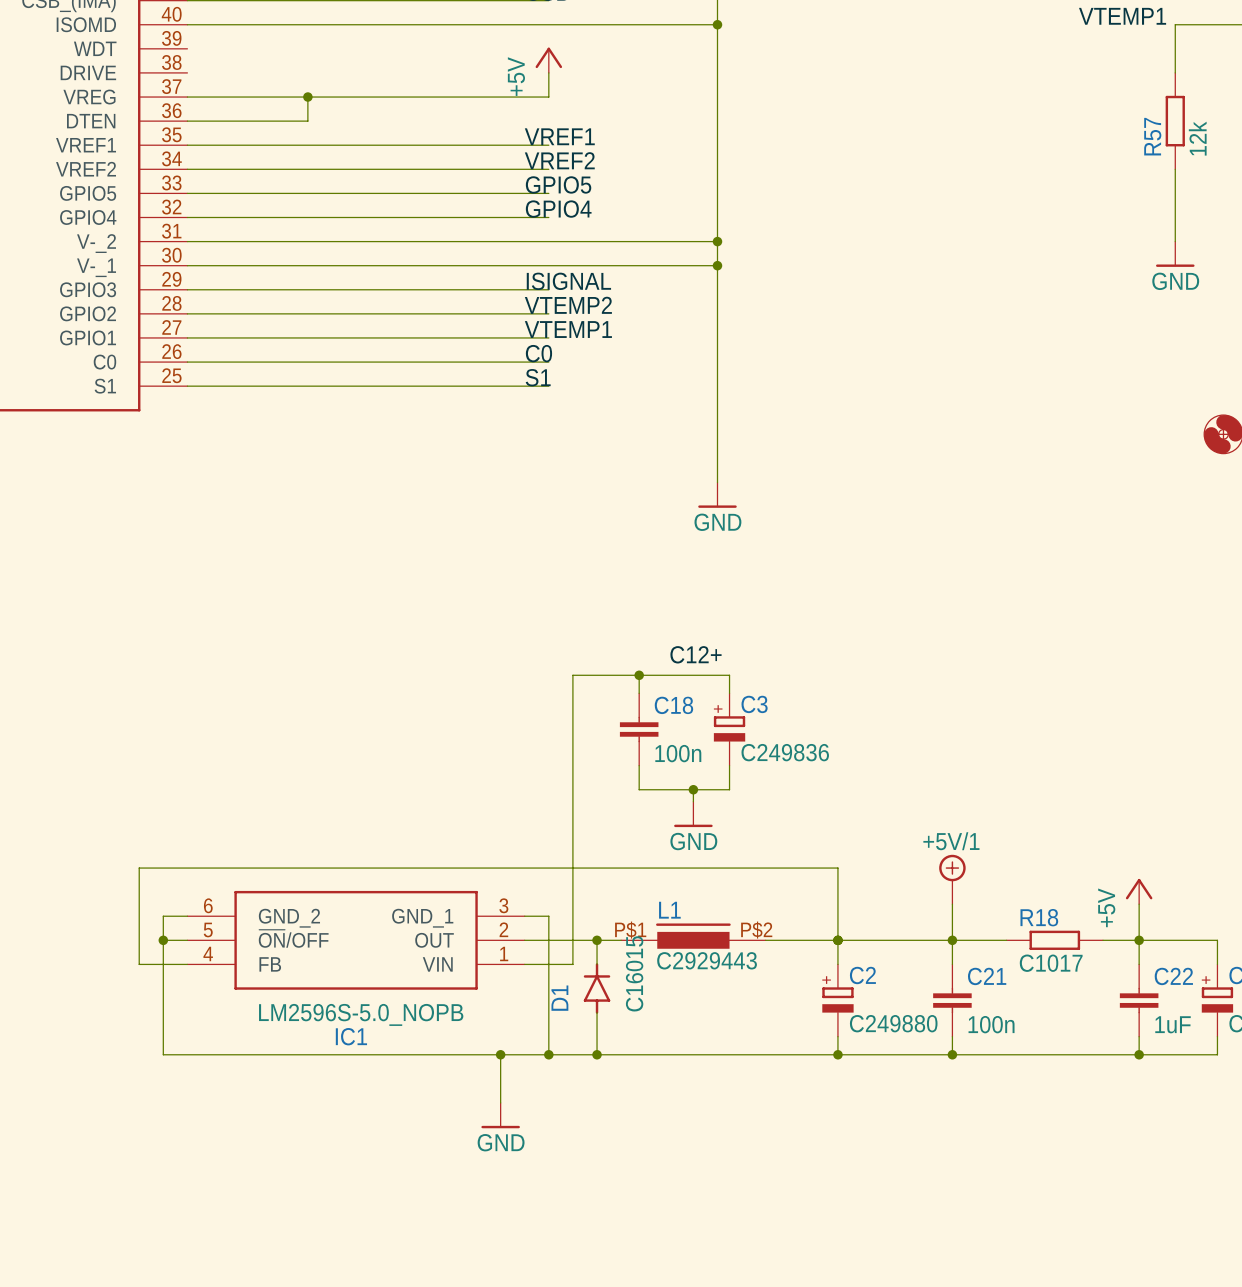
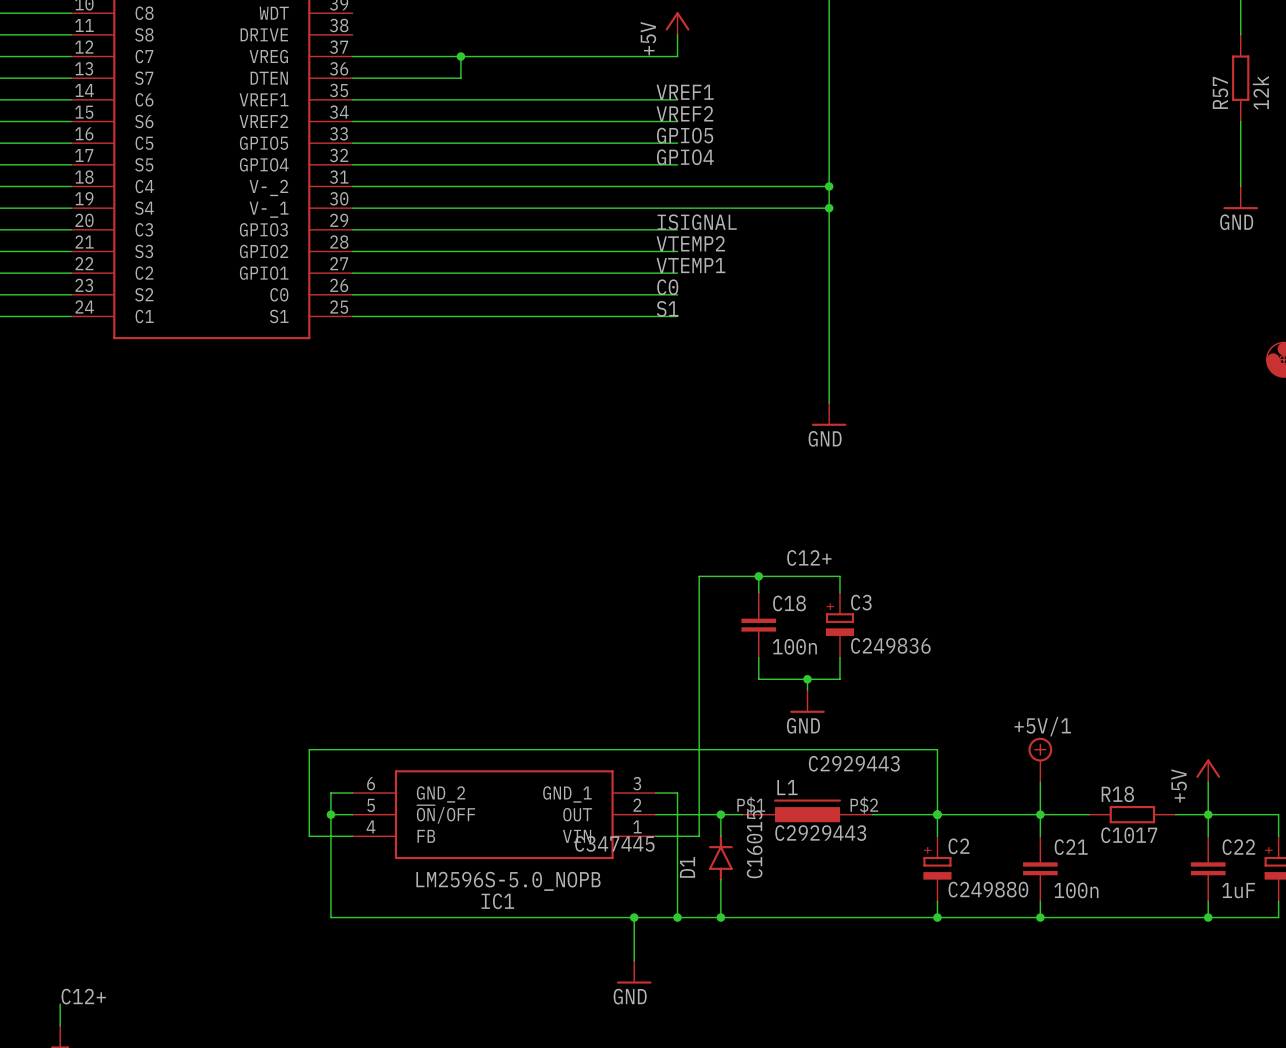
L1 text: none -> C2929443 (854, 763)
IC1 text: none -> C347445 (614, 843)

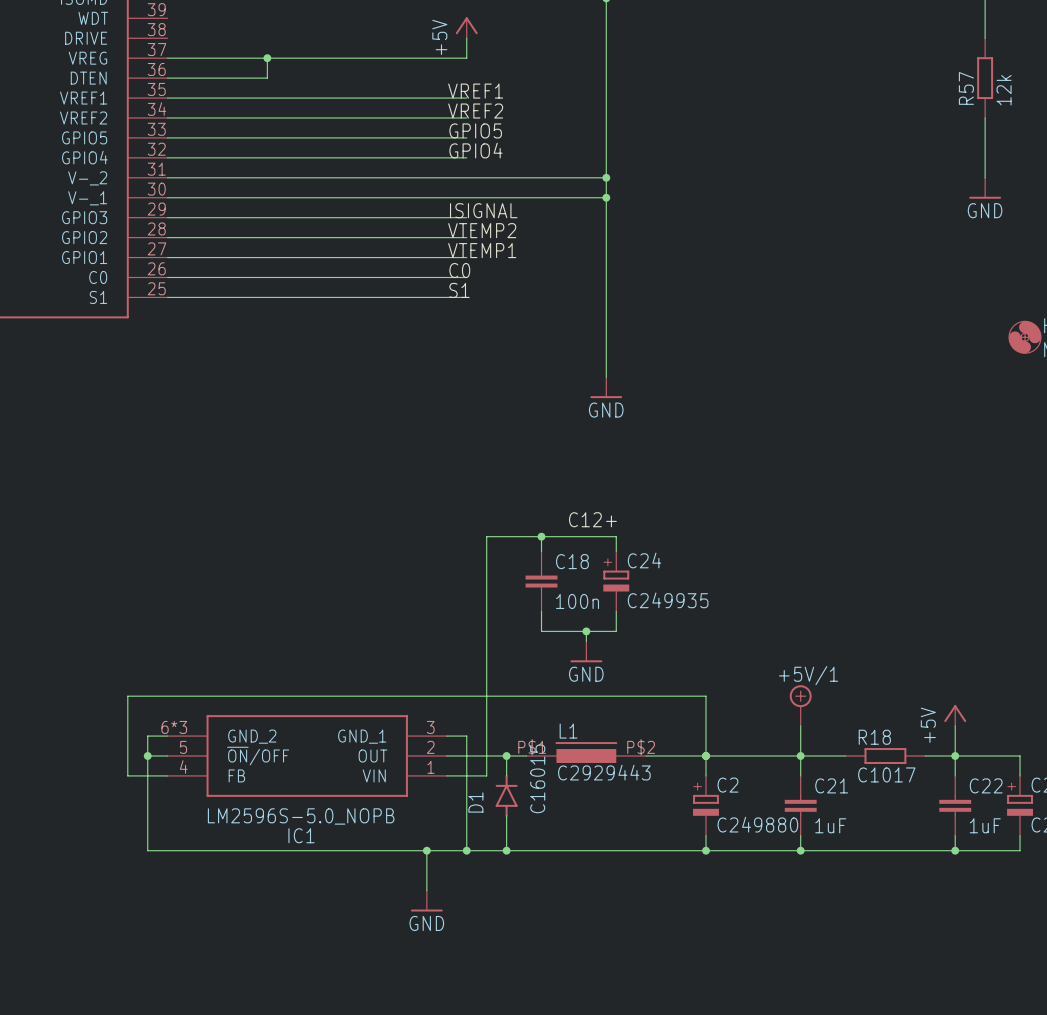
C3 name: C3 (861, 602) -> C24 (644, 560)
C3 value: C249836 (890, 645) -> C249935 (668, 600)
L1 text: C2929443 (854, 763) -> none
IC1 pin number: 6 (371, 783) -> 6*3 (174, 727)
IC1 text: C347445 (614, 843) -> none
C21 value: 100n (1076, 890) -> 1uF (830, 825)

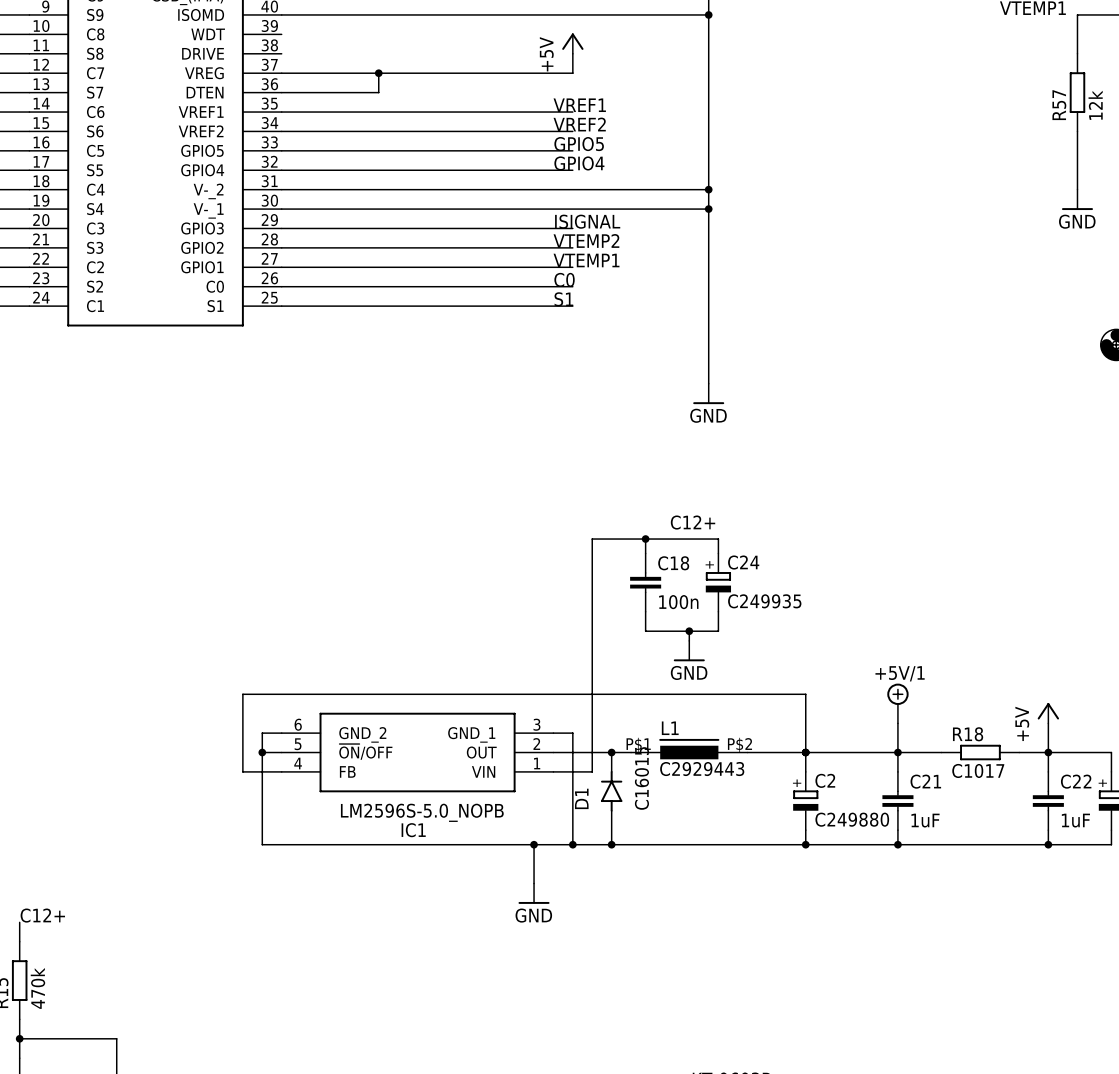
IC1 pin number: 6*3 (174, 727) -> 6 (298, 724)

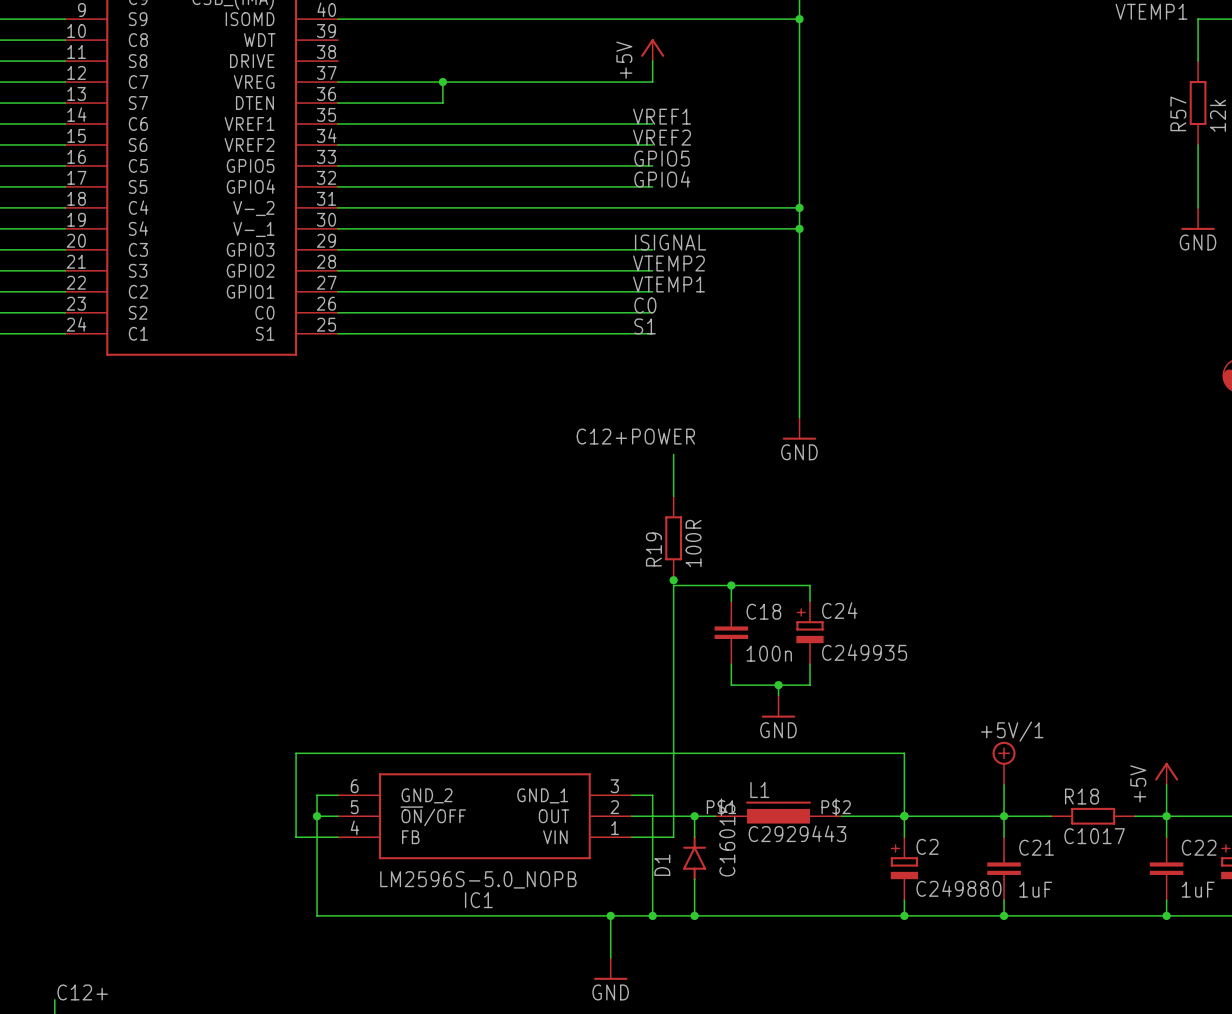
label: none -> C12+POWER (635, 436)
wire: none -> (673, 454) (673, 496)
R19: none -> 100R (673, 538)
label: C12+ (693, 522) -> none
junction: none -> (673, 580)

